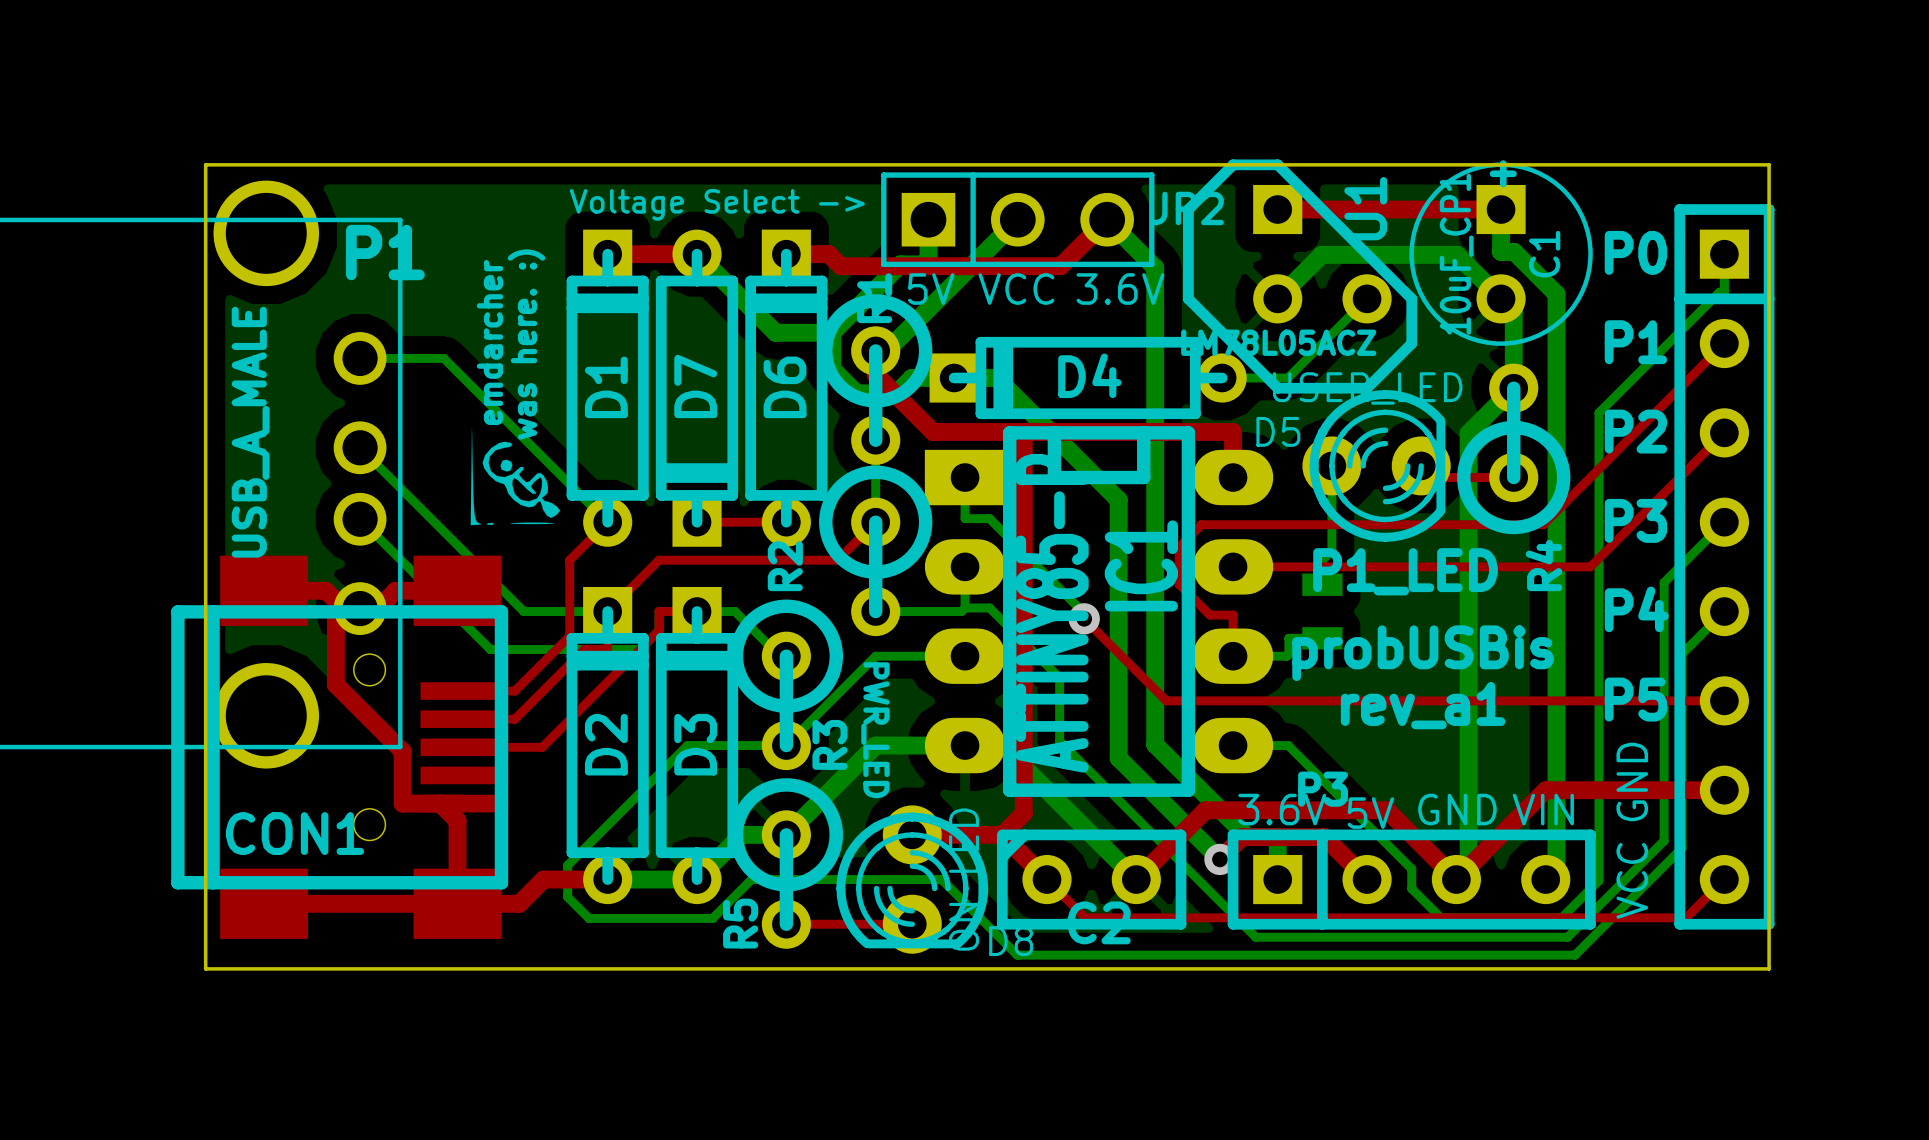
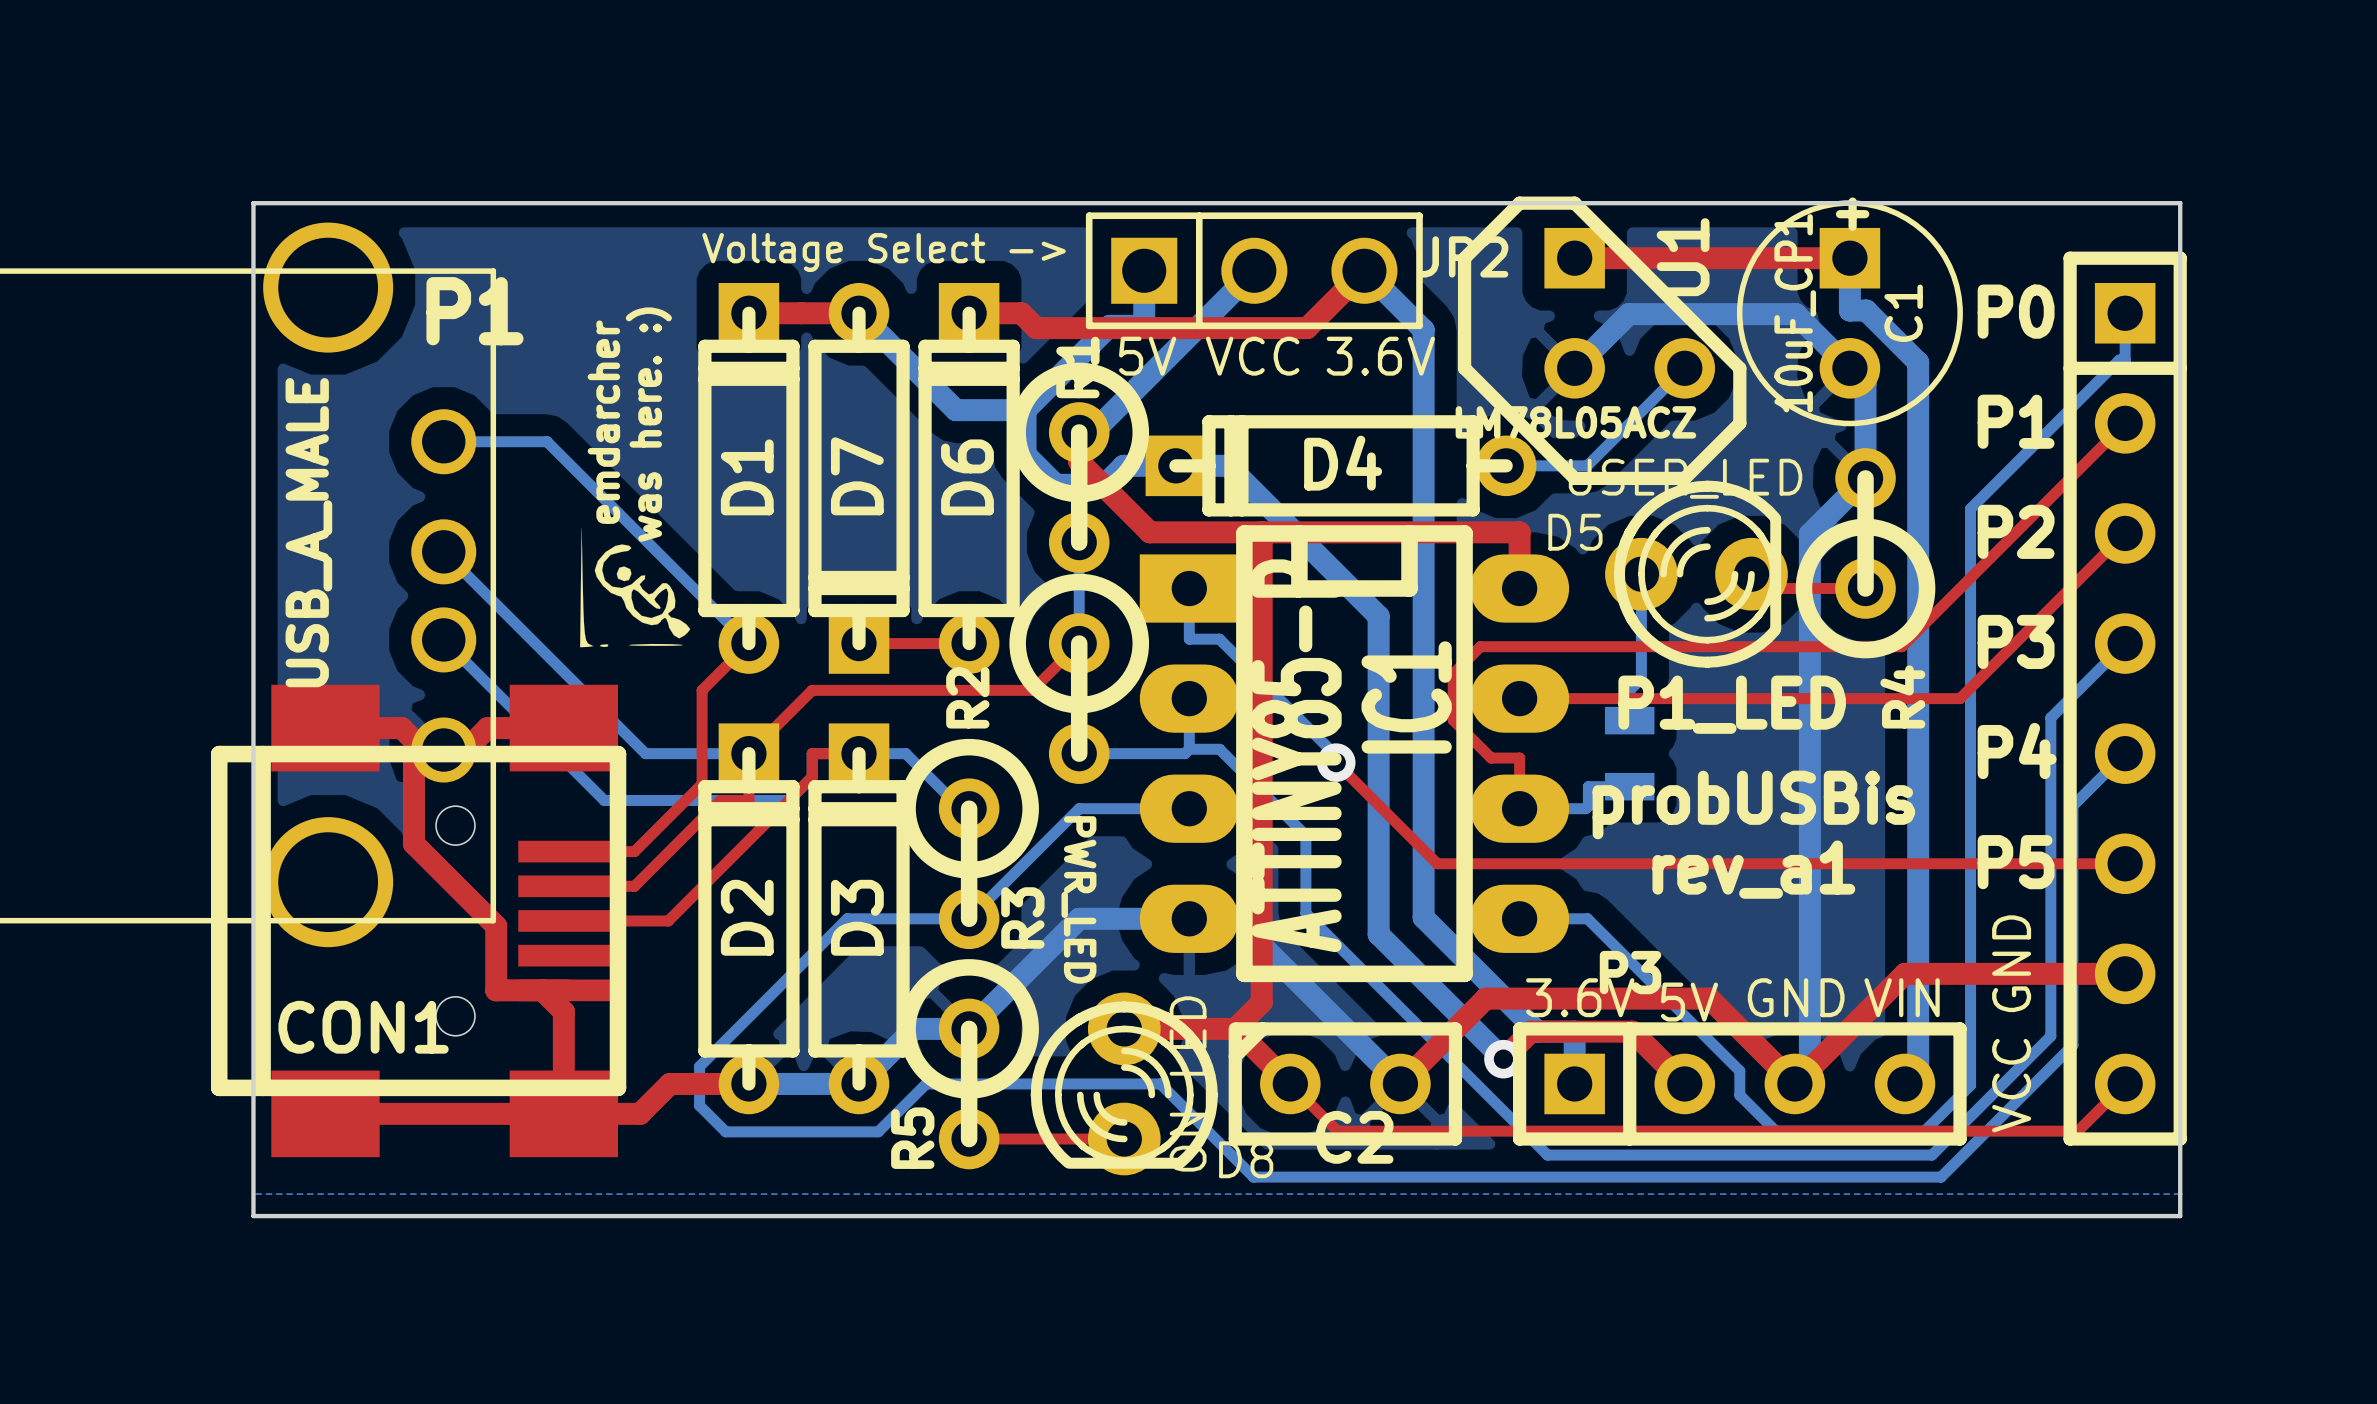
board edge: (205, 968) (1769, 968) -> (253, 1194) (253, 1216) (2180, 1216) (2180, 1194)

